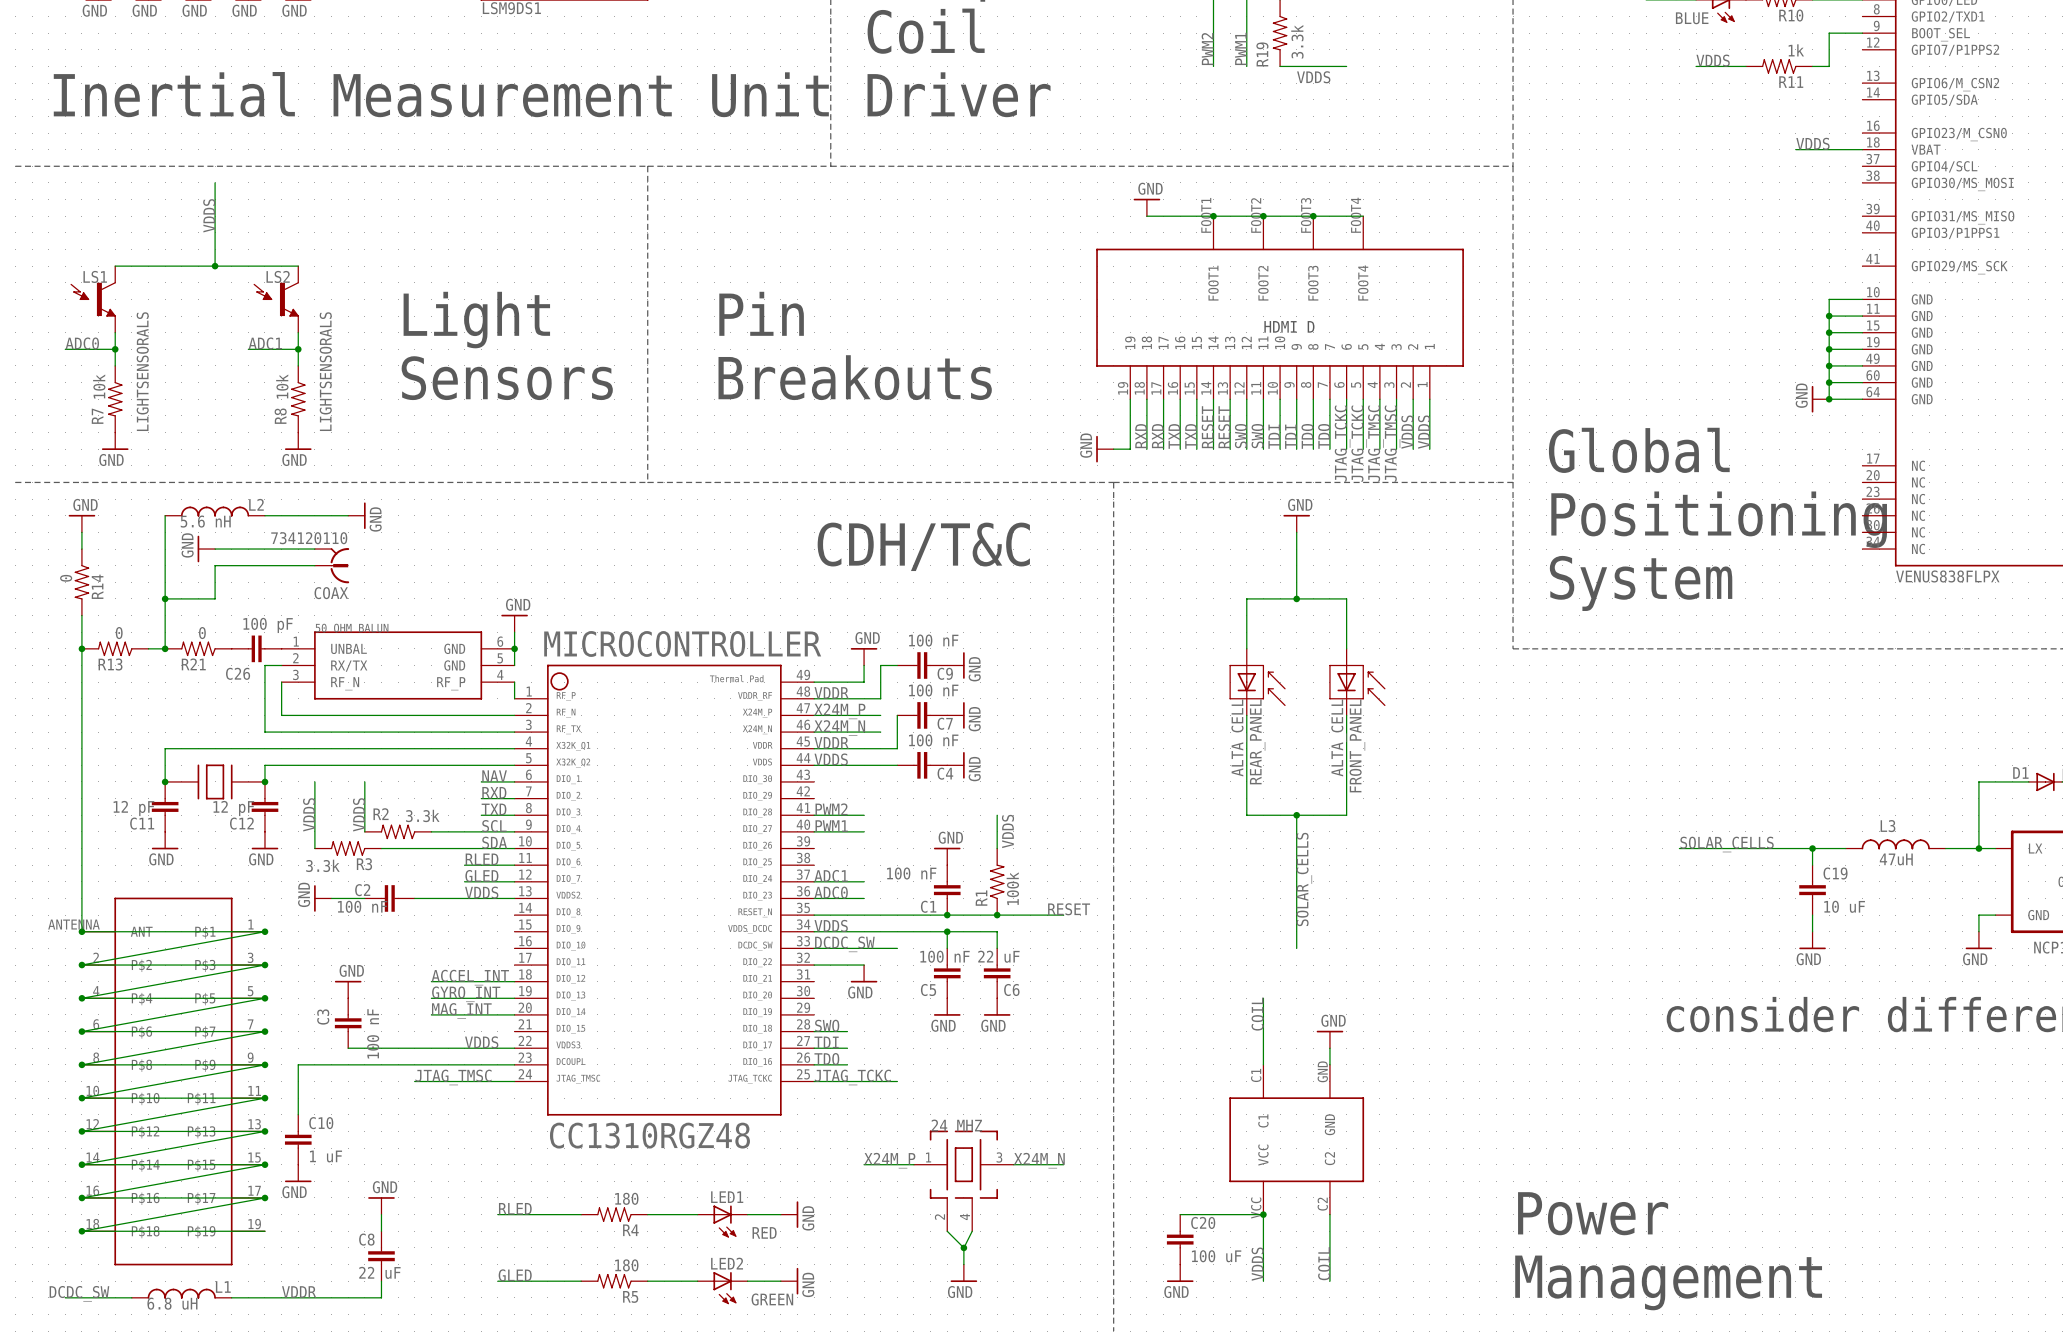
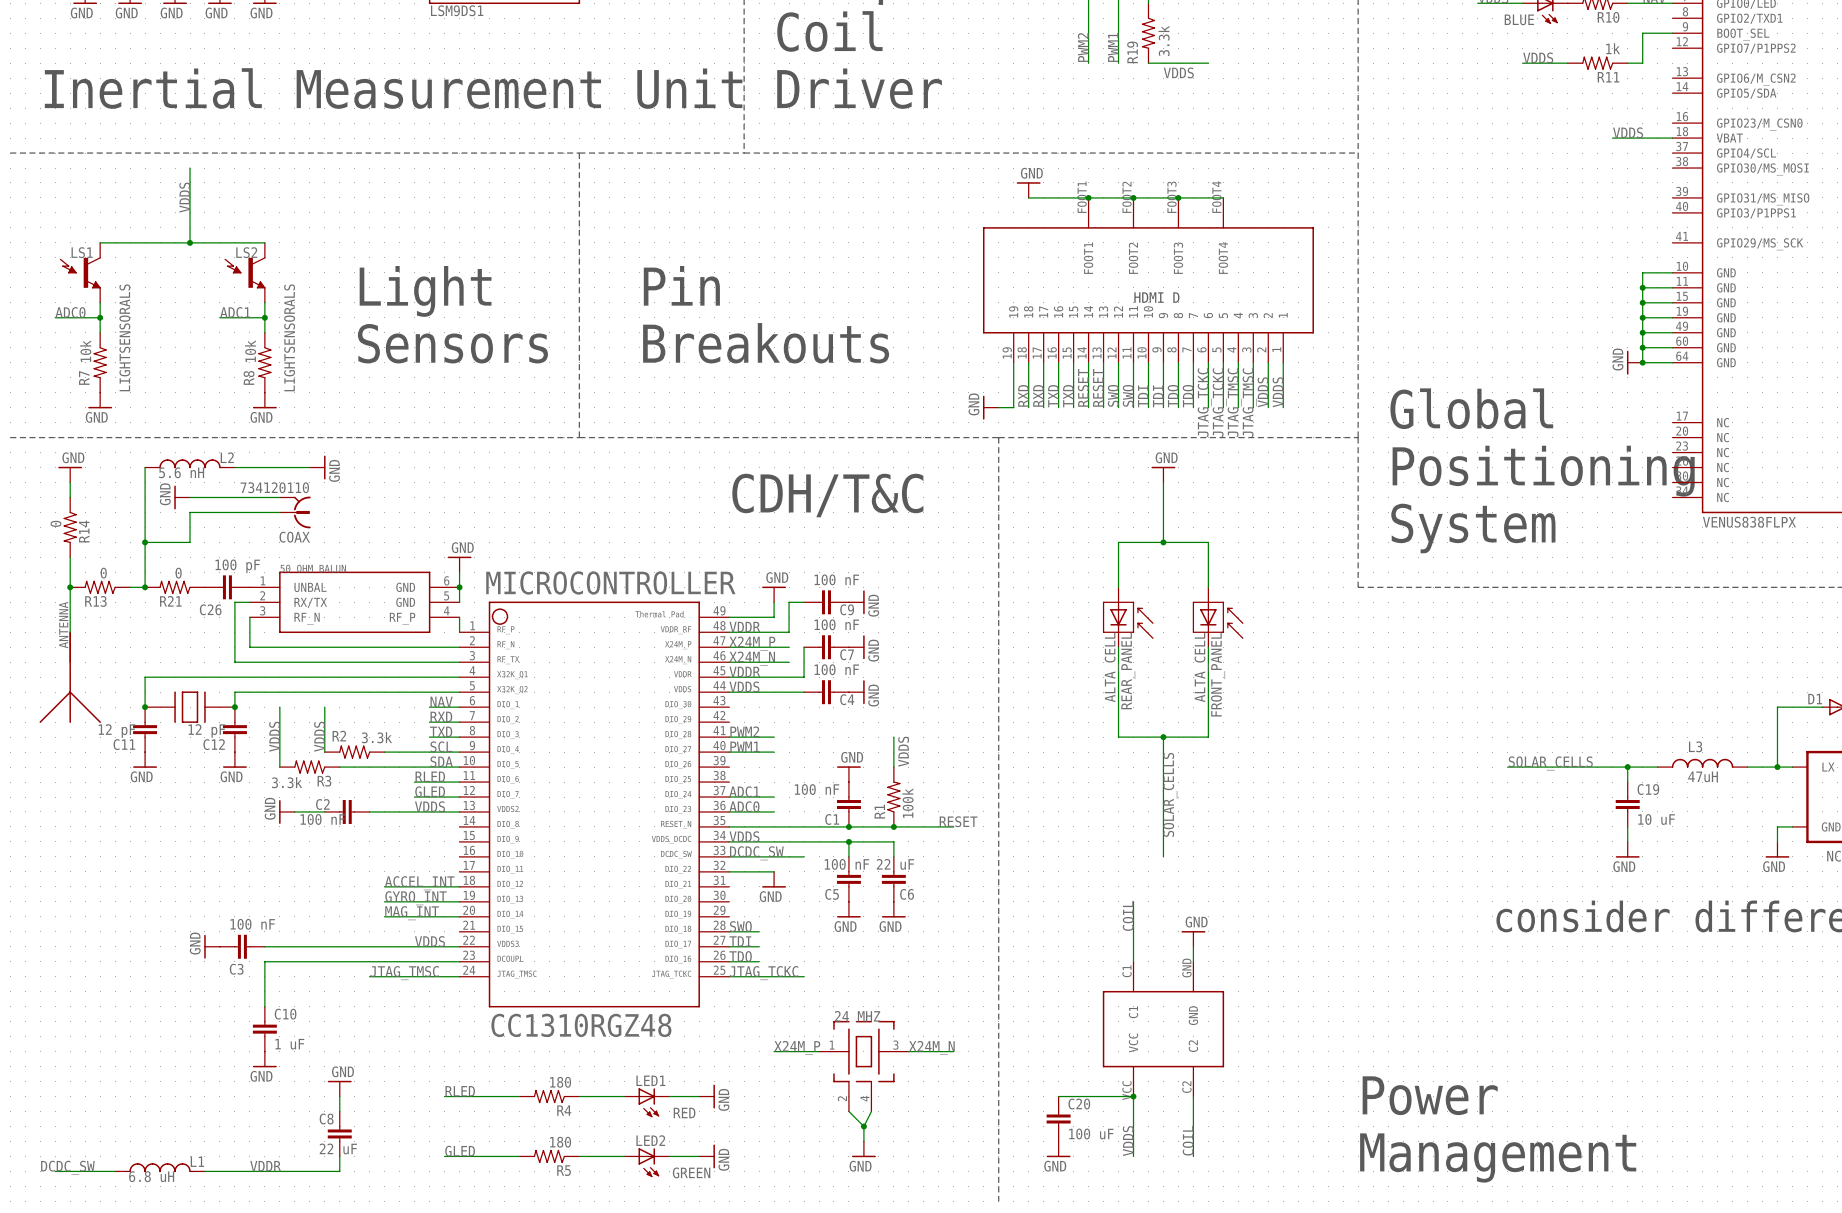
wire: (81, 698) (81, 931) (264, 931) (81, 965) (264, 965) (81, 998) (264, 998) (81, 1031) (264, 1031) (81, 1064) (264, 1064) (81, 1098) (264, 1098) (81, 1131) (264, 1131) (81, 1164) (264, 1164) (81, 1197) (264, 1197) (81, 1231) (264, 1231) -> none
part: none -> (70, 677)
junction: (81, 931) -> none
junction: (264, 931) -> none
junction: (81, 965) -> none
junction: (264, 965) -> none
power symbol rotation: 0° (348, 981) -> 90° counterclockwise (204, 946)
power symbol position: GND (348, 989) -> GND (212, 946)
junction: (81, 998) -> none
junction: (264, 998) -> none
C3 name position: C3 (323, 1016) -> C3 (236, 969)
C3 rotation: 0° (348, 1023) -> 90° clockwise (242, 946)
C3 position: (348, 1023) -> (242, 946)
junction: (81, 1031) -> none
junction: (264, 1031) -> none
C3 value position: 100 nF (373, 1033) -> 100 nF (252, 924)
wire: none -> (264, 946) (309, 946)
junction: (81, 1064) -> none
junction: (264, 1064) -> none
part: (173, 1081) -> none
junction: (81, 1098) -> none
junction: (264, 1098) -> none
junction: (81, 1131) -> none
junction: (264, 1131) -> none
junction: (81, 1164) -> none
junction: (264, 1164) -> none
junction: (81, 1197) -> none
junction: (264, 1197) -> none
junction: (81, 1231) -> none

